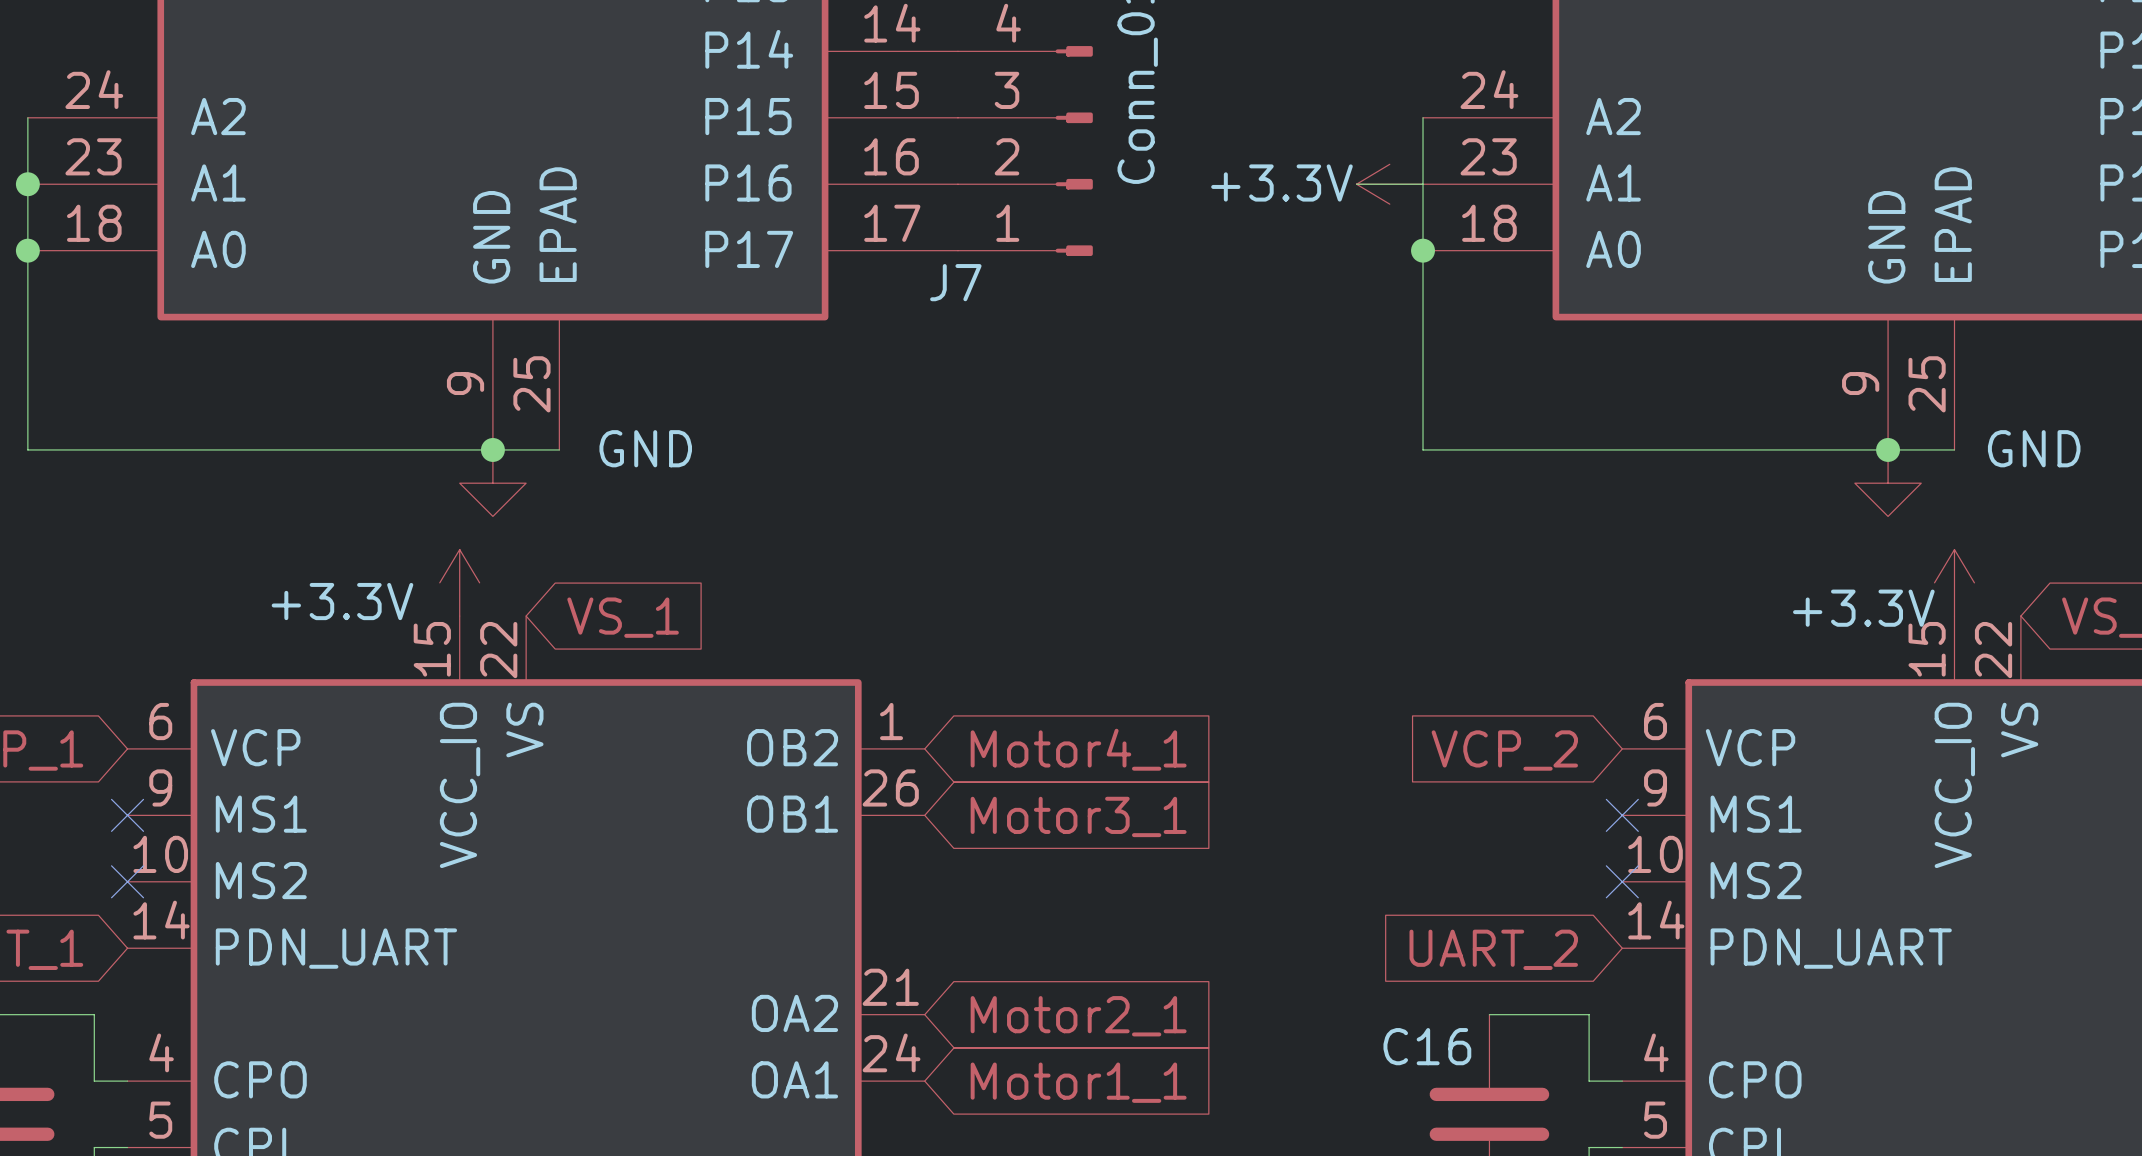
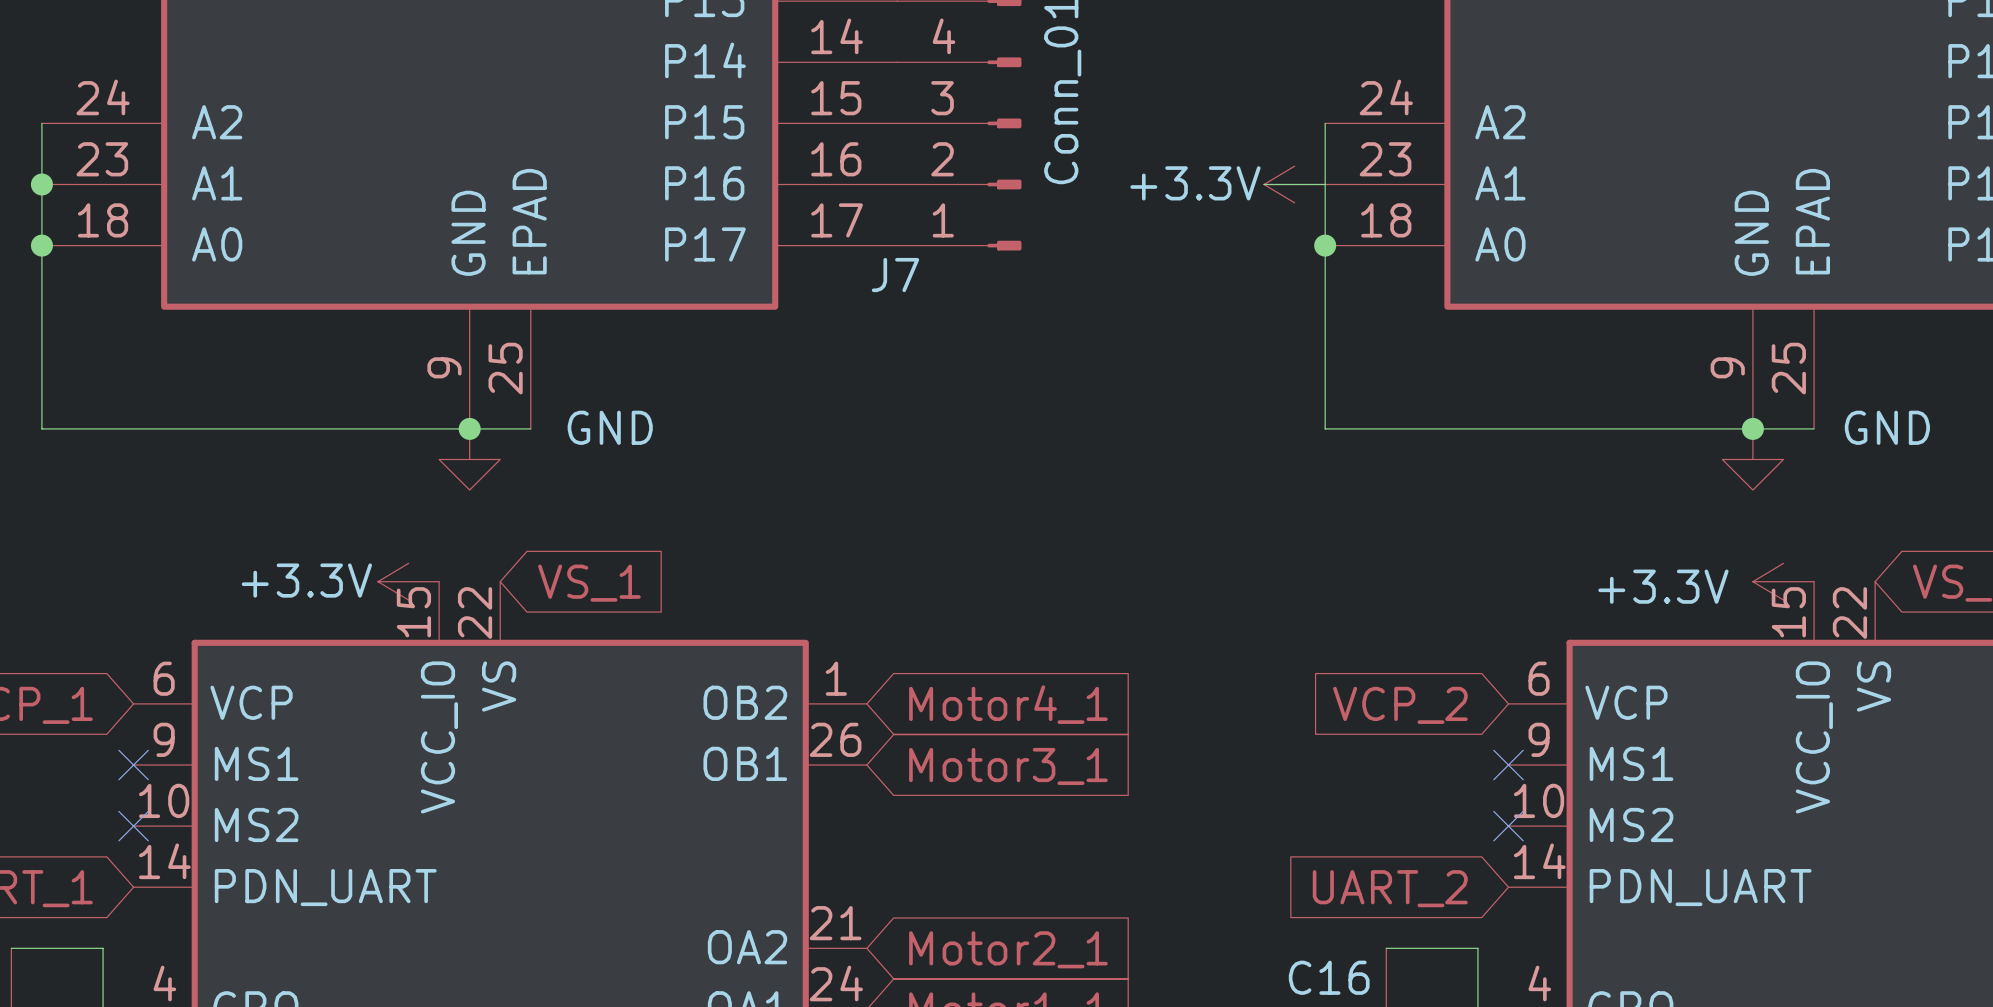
power symbol rotation: 0° (459, 582) -> 90° counterclockwise (408, 581)
power symbol position: +3.3V (459, 582) -> +3.3V (408, 581)
power symbol rotation: 0° (1954, 582) -> 90° counterclockwise (1783, 581)
power symbol position: +3.3V (1954, 582) -> +3.3V (1783, 581)

